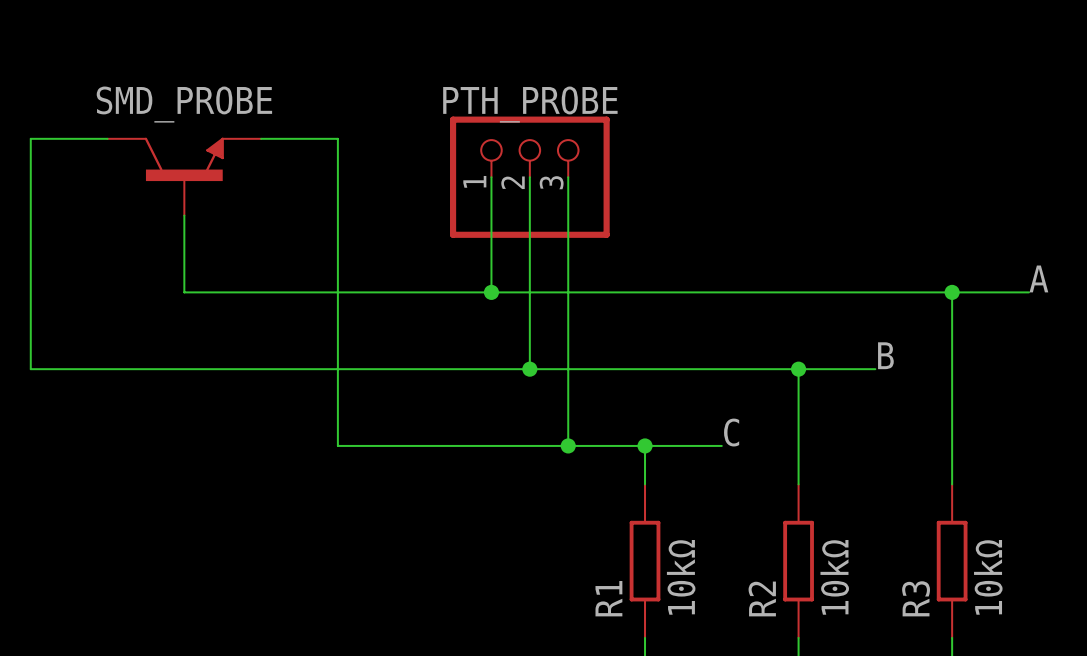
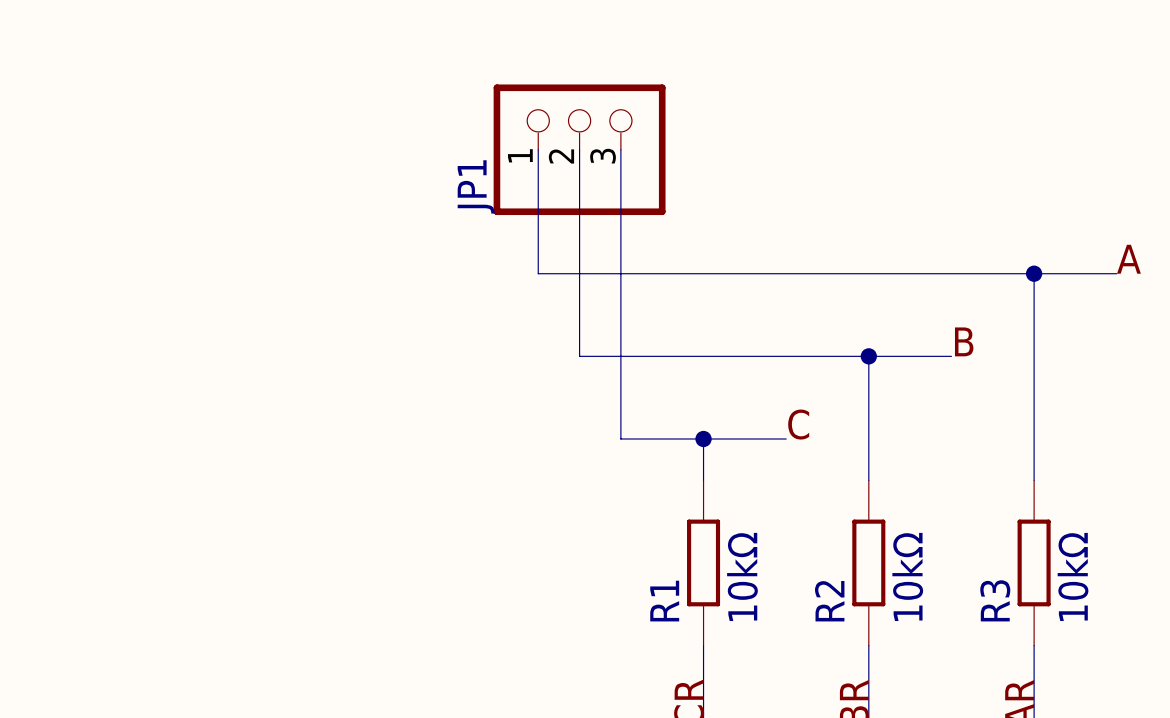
PTH_PROBE name: PTH_PROBE (530, 104) -> JP1 (476, 186)
wire: (107, 138) (30, 138) (30, 369) (529, 369) -> none
wire: (261, 138) (337, 138) (337, 445) (568, 445) -> none
SMD_PROBE: (184, 176) -> none
wire: (184, 215) (184, 292) (491, 292) -> none
junction: (491, 292) -> none
junction: (529, 369) -> none
junction: (568, 445) -> none

